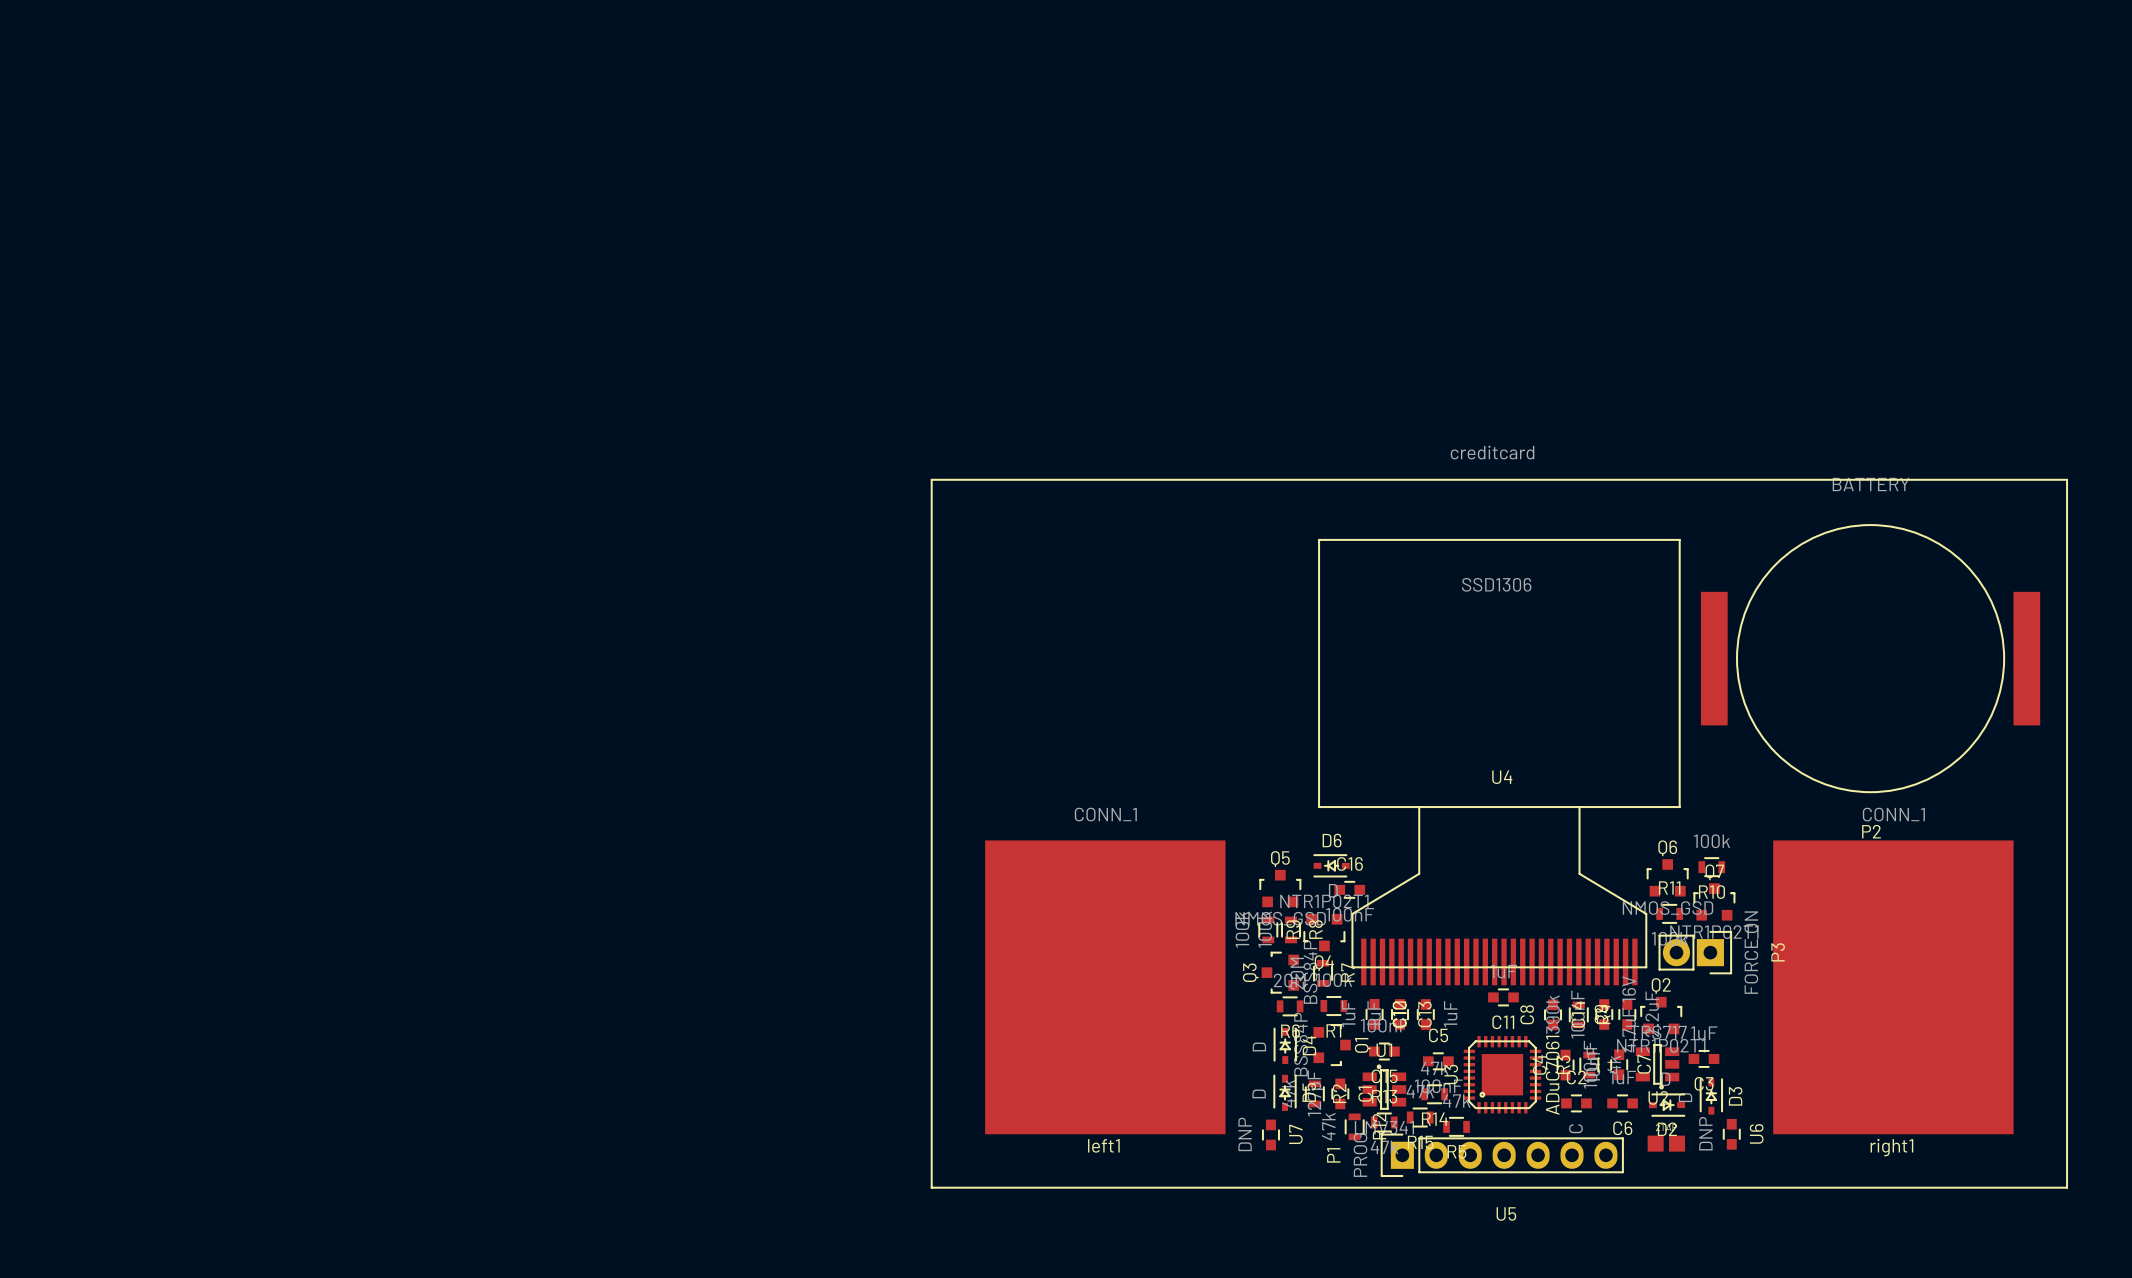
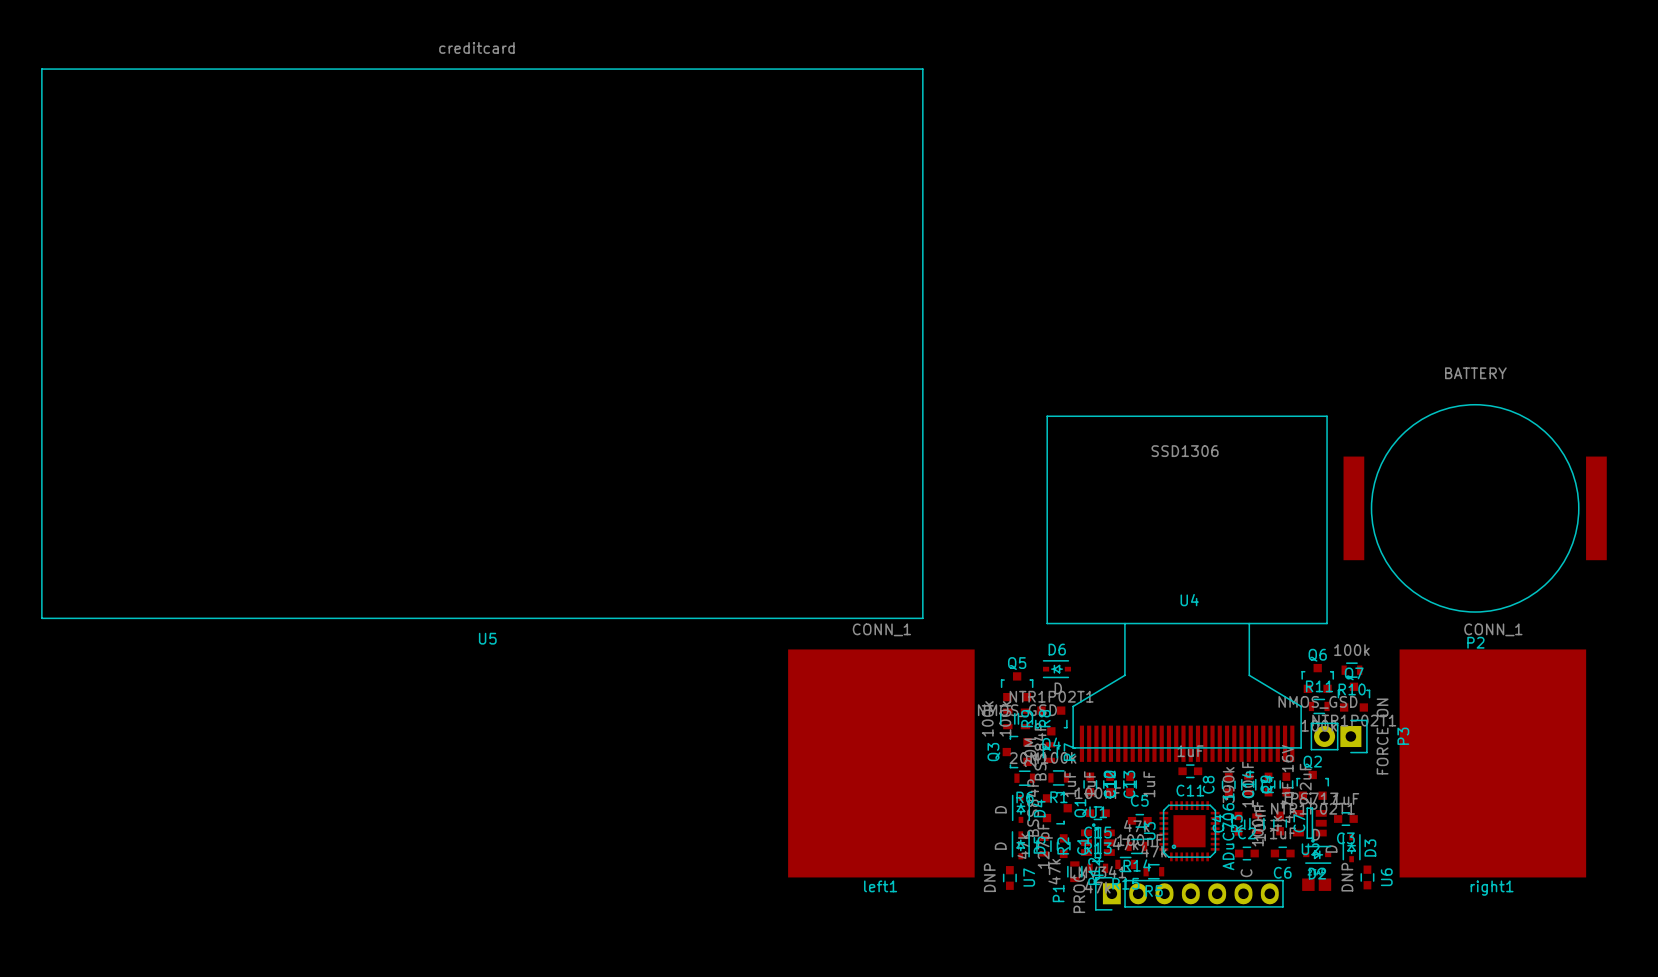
U5 position: (1499, 833) -> (482, 343)
C16: 100nF (1349, 889) -> none

